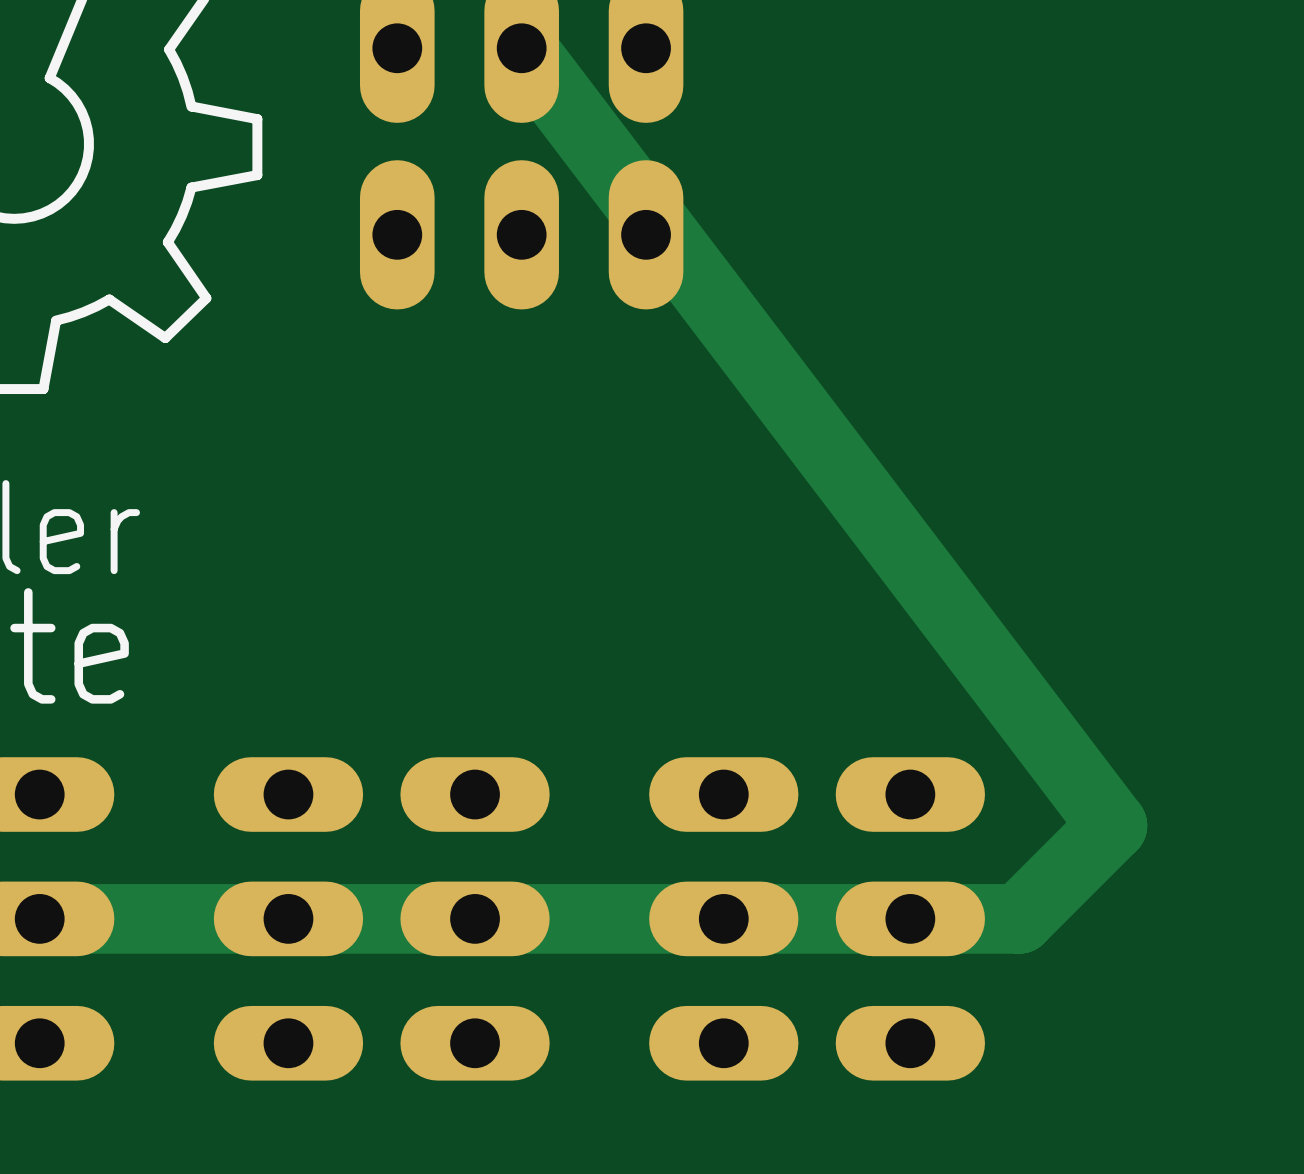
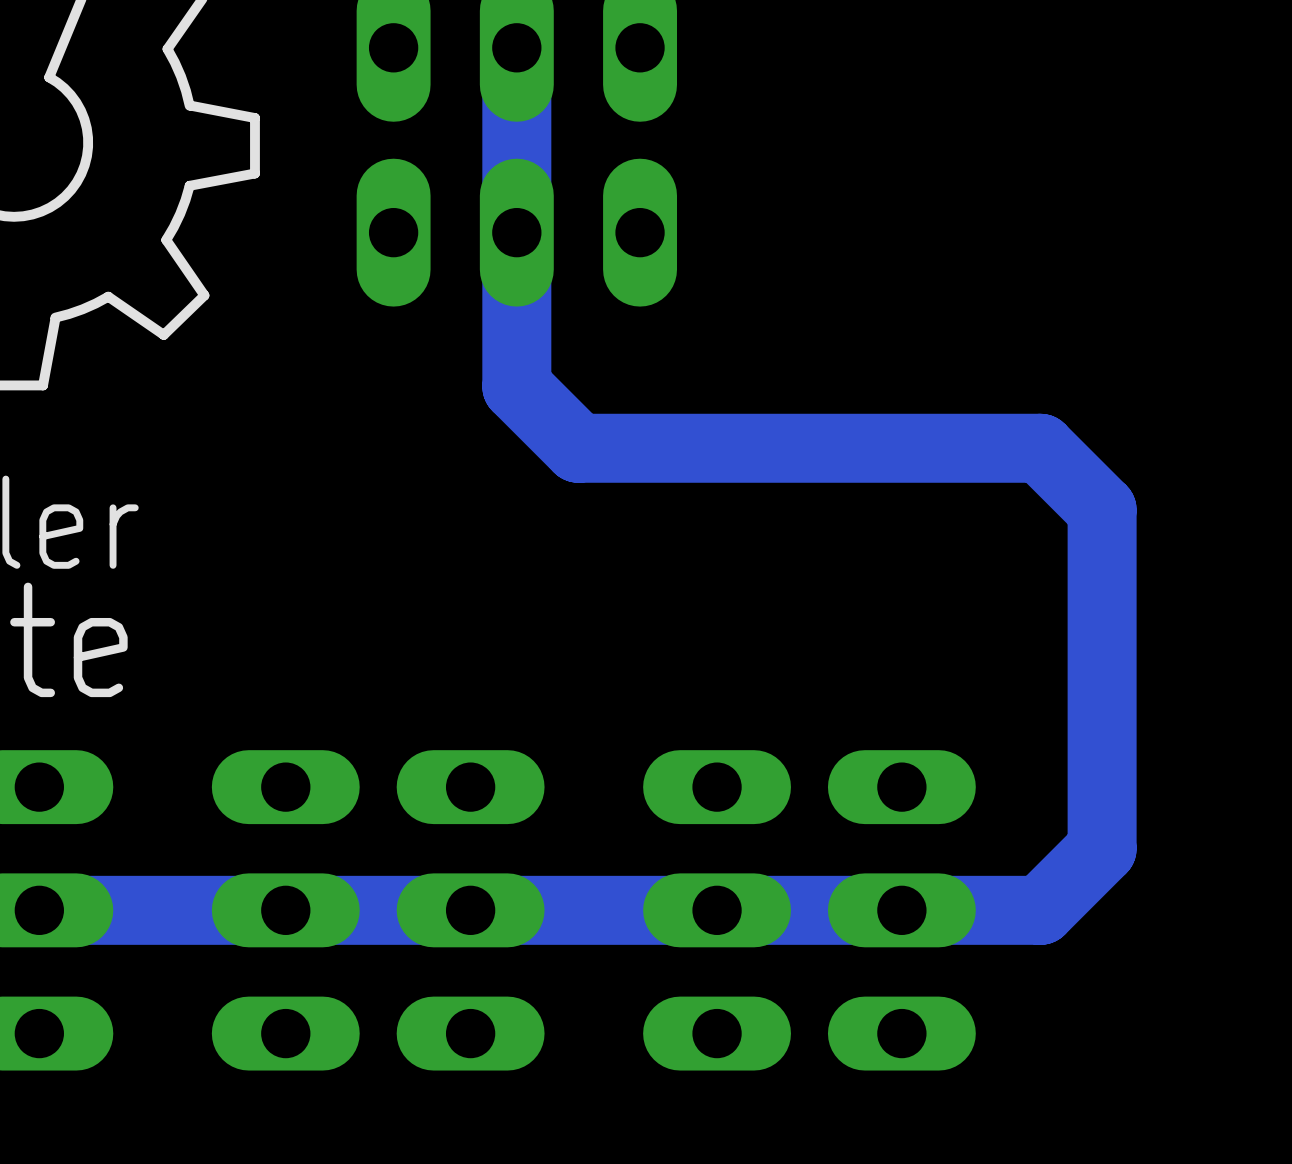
track: (521, 48) (1112, 825) (1019, 918) -> (516, 47) (516, 386) (578, 448) (1040, 448) (1102, 509) (1102, 848) (1040, 910) (1009, 910)

